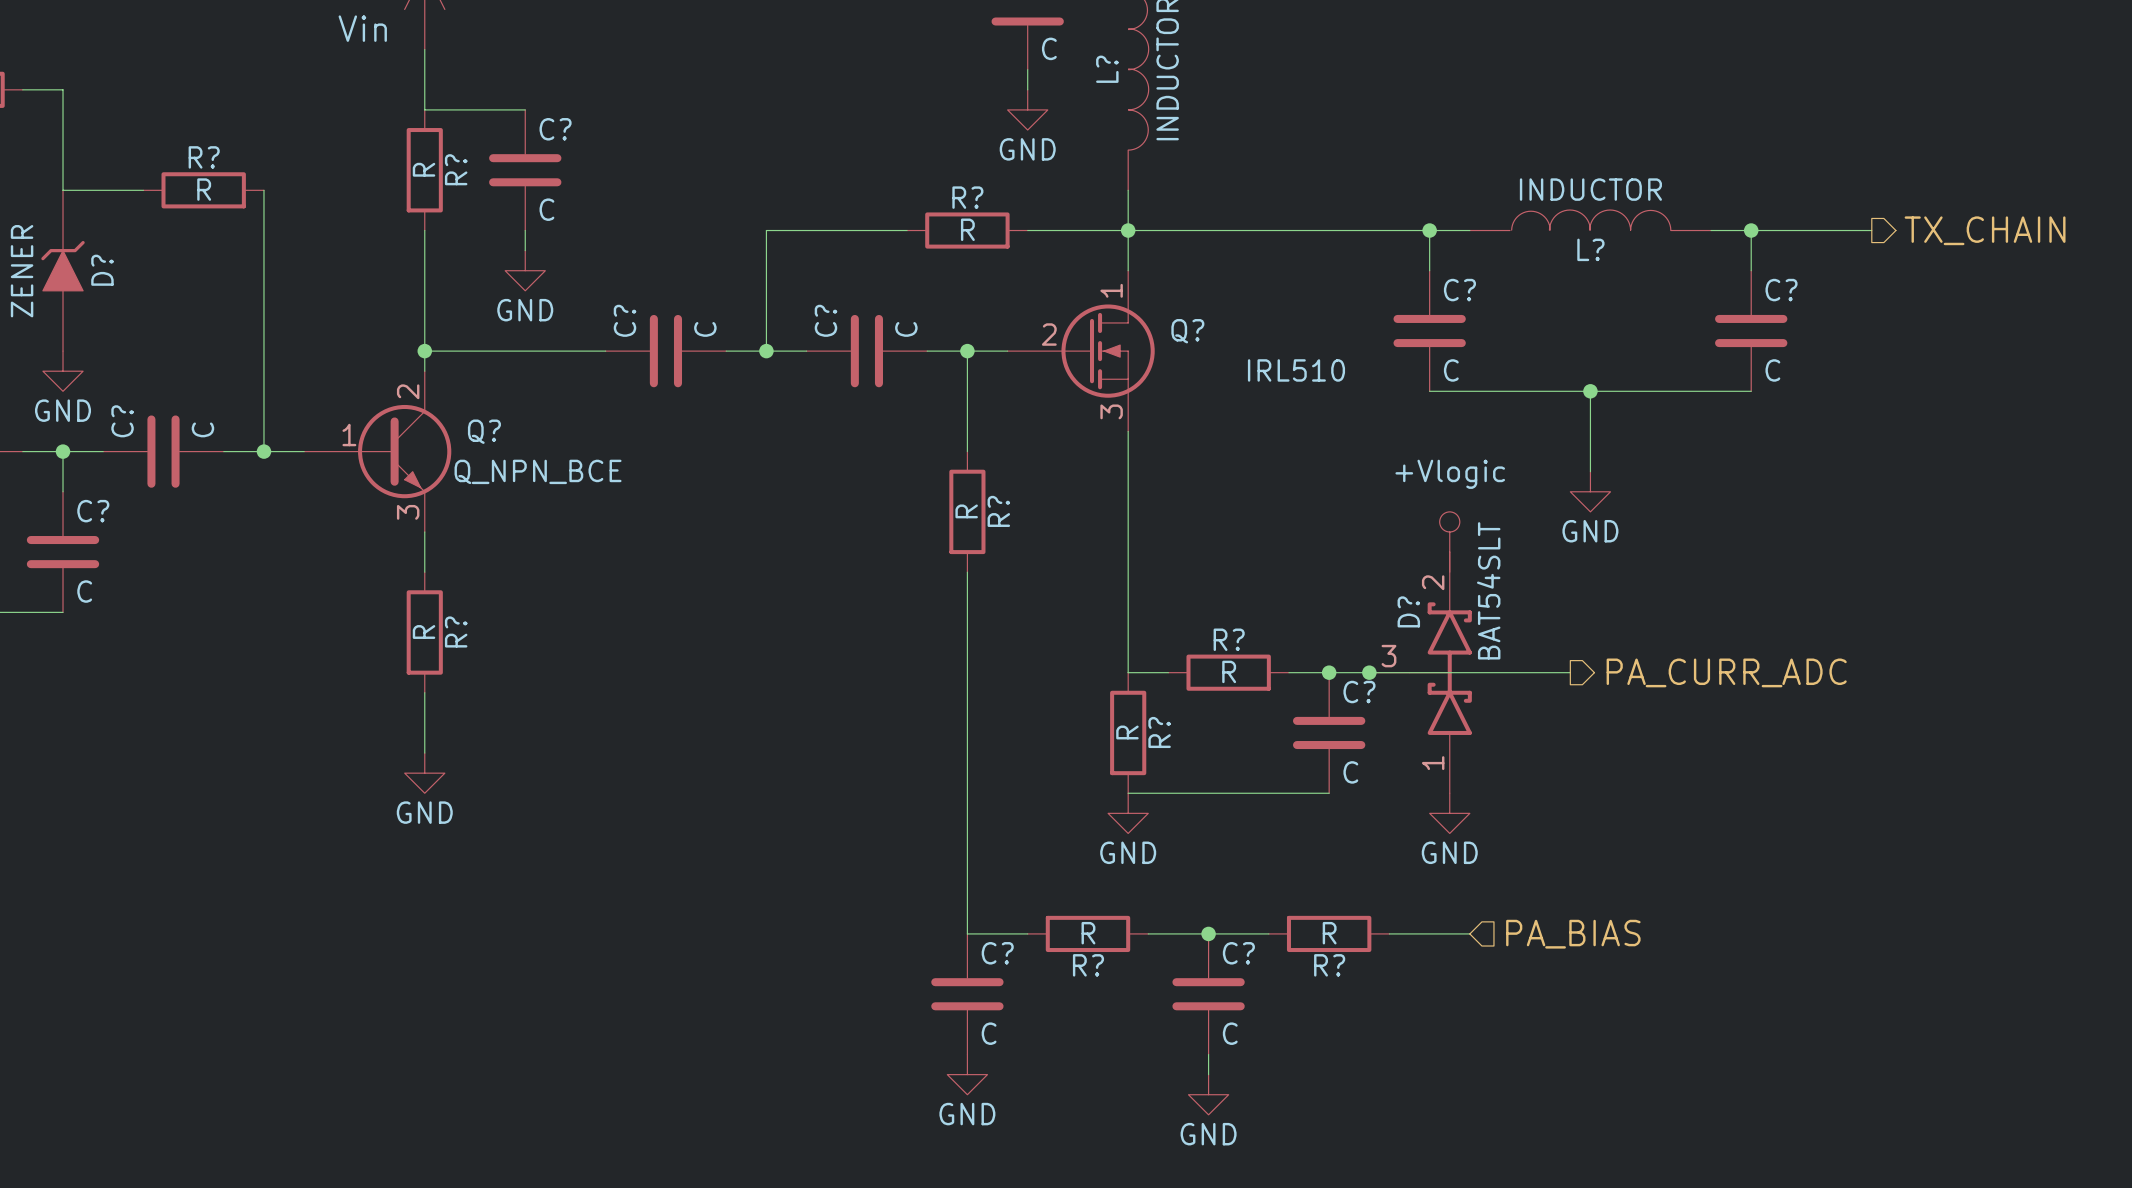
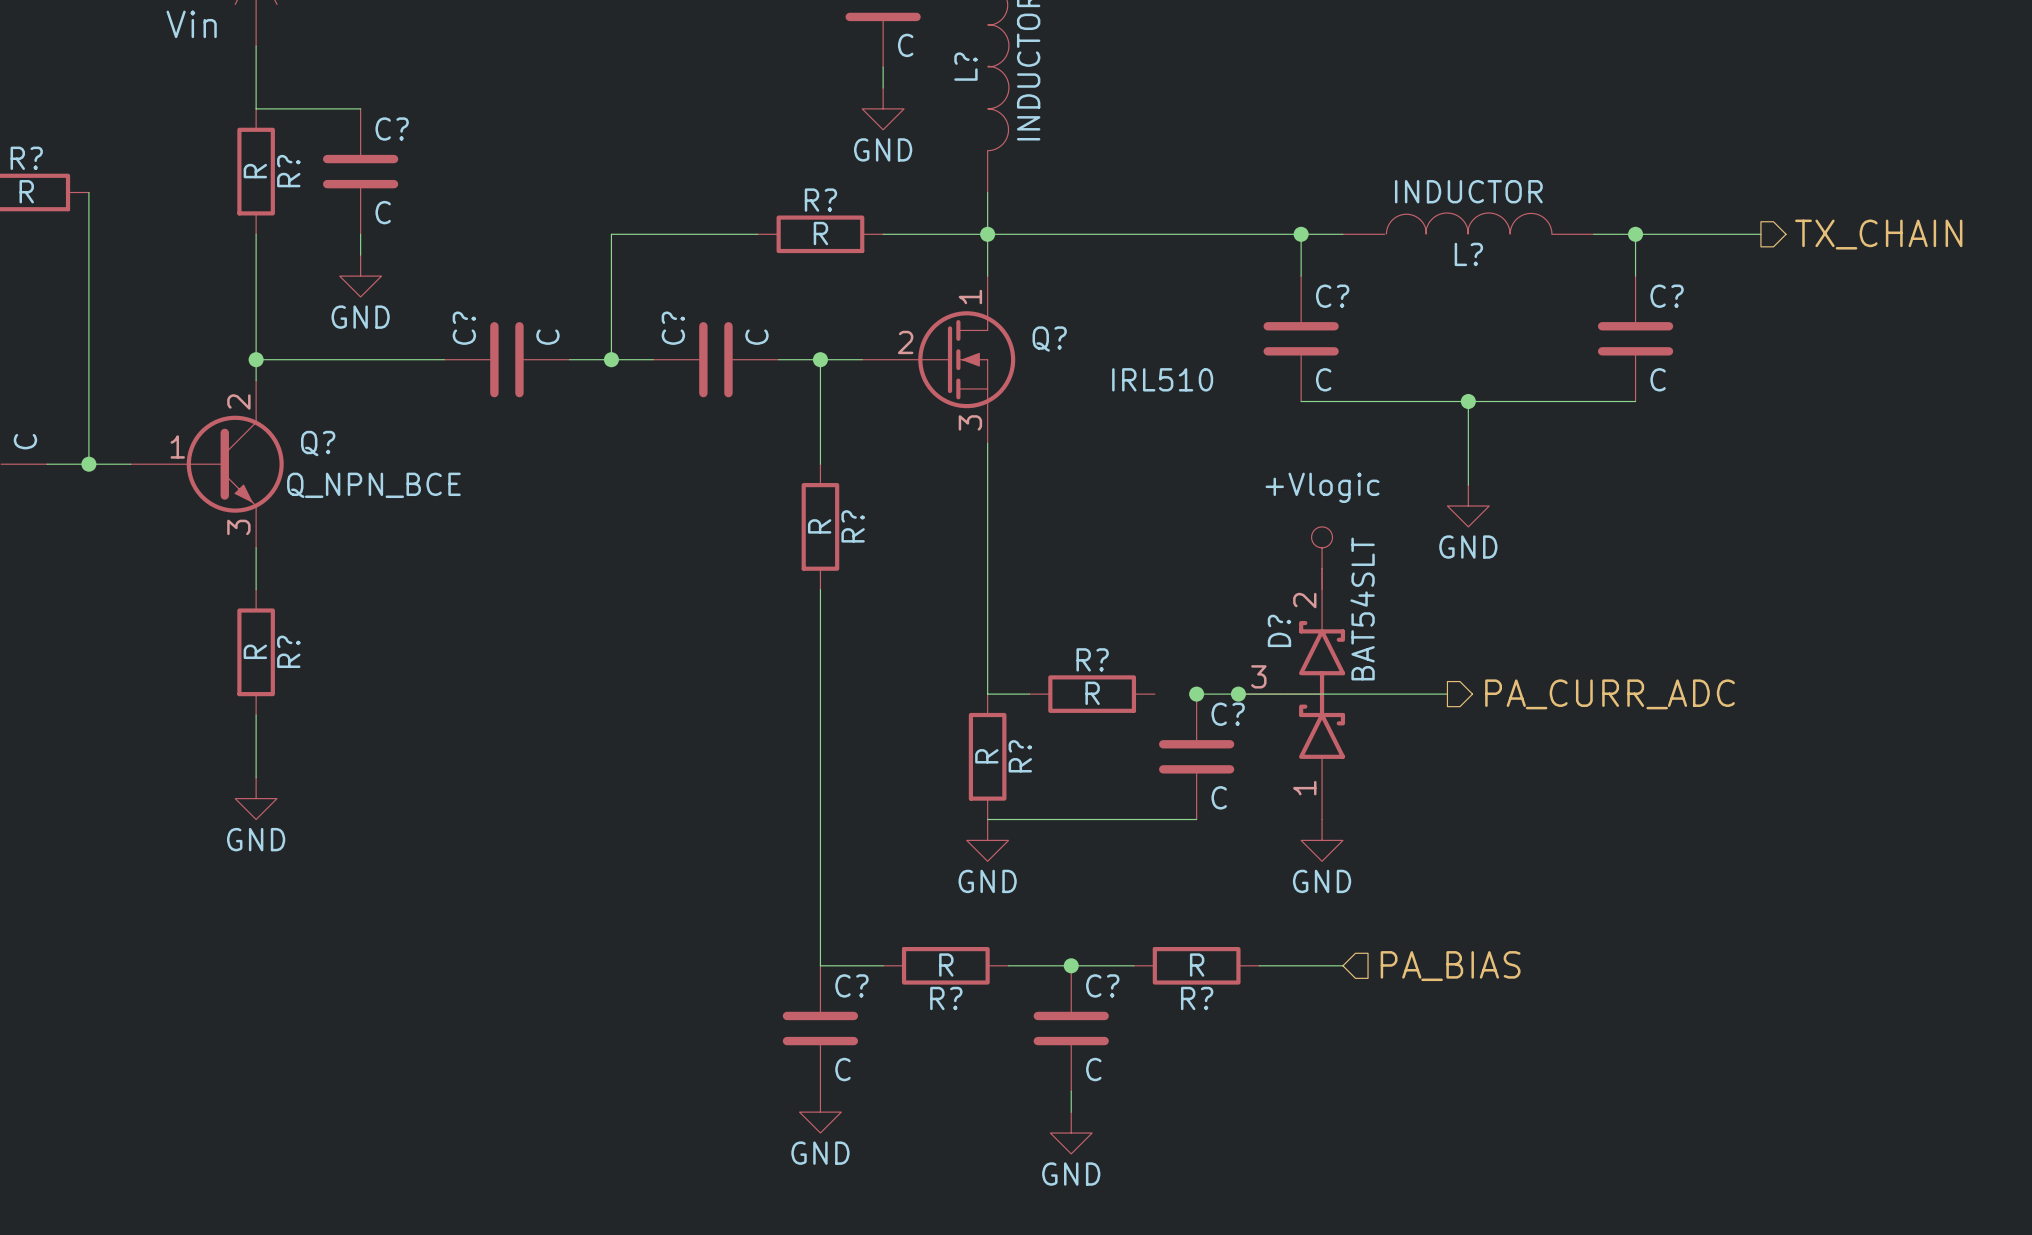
wire: (1288, 672) (1329, 672) -> none

